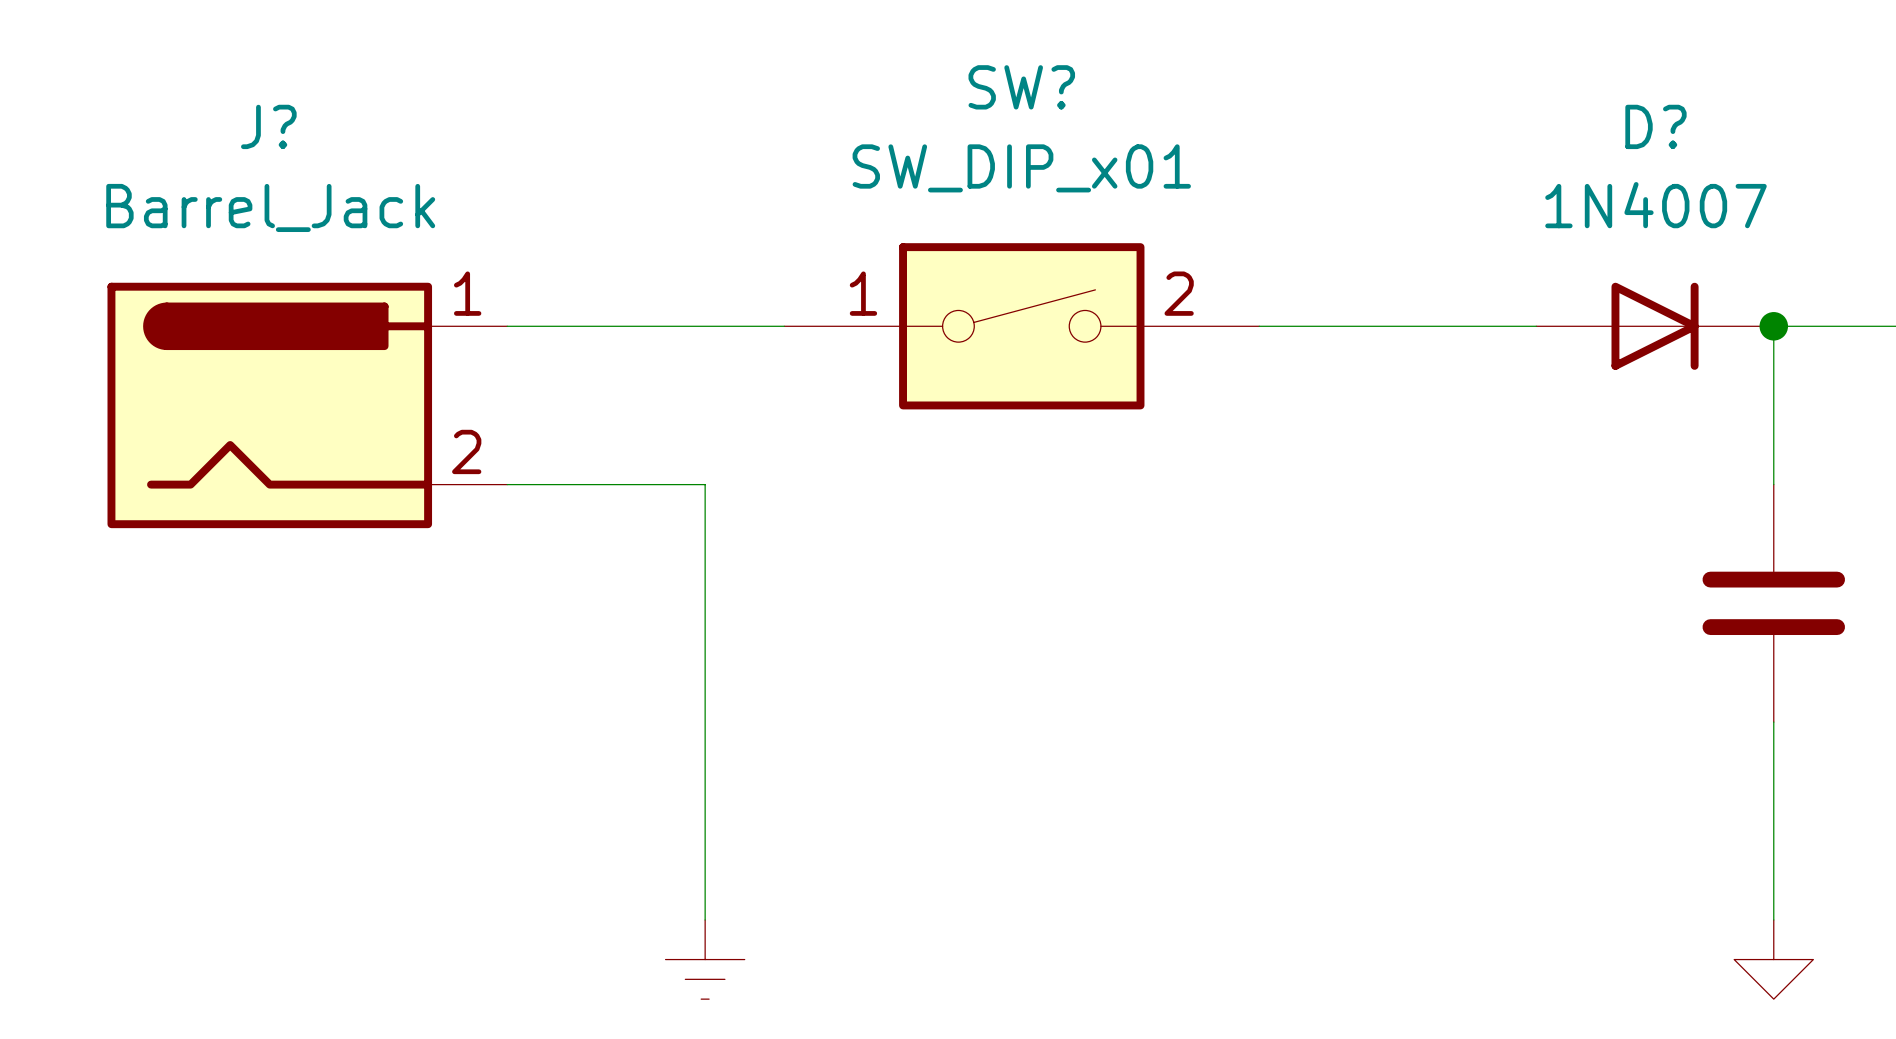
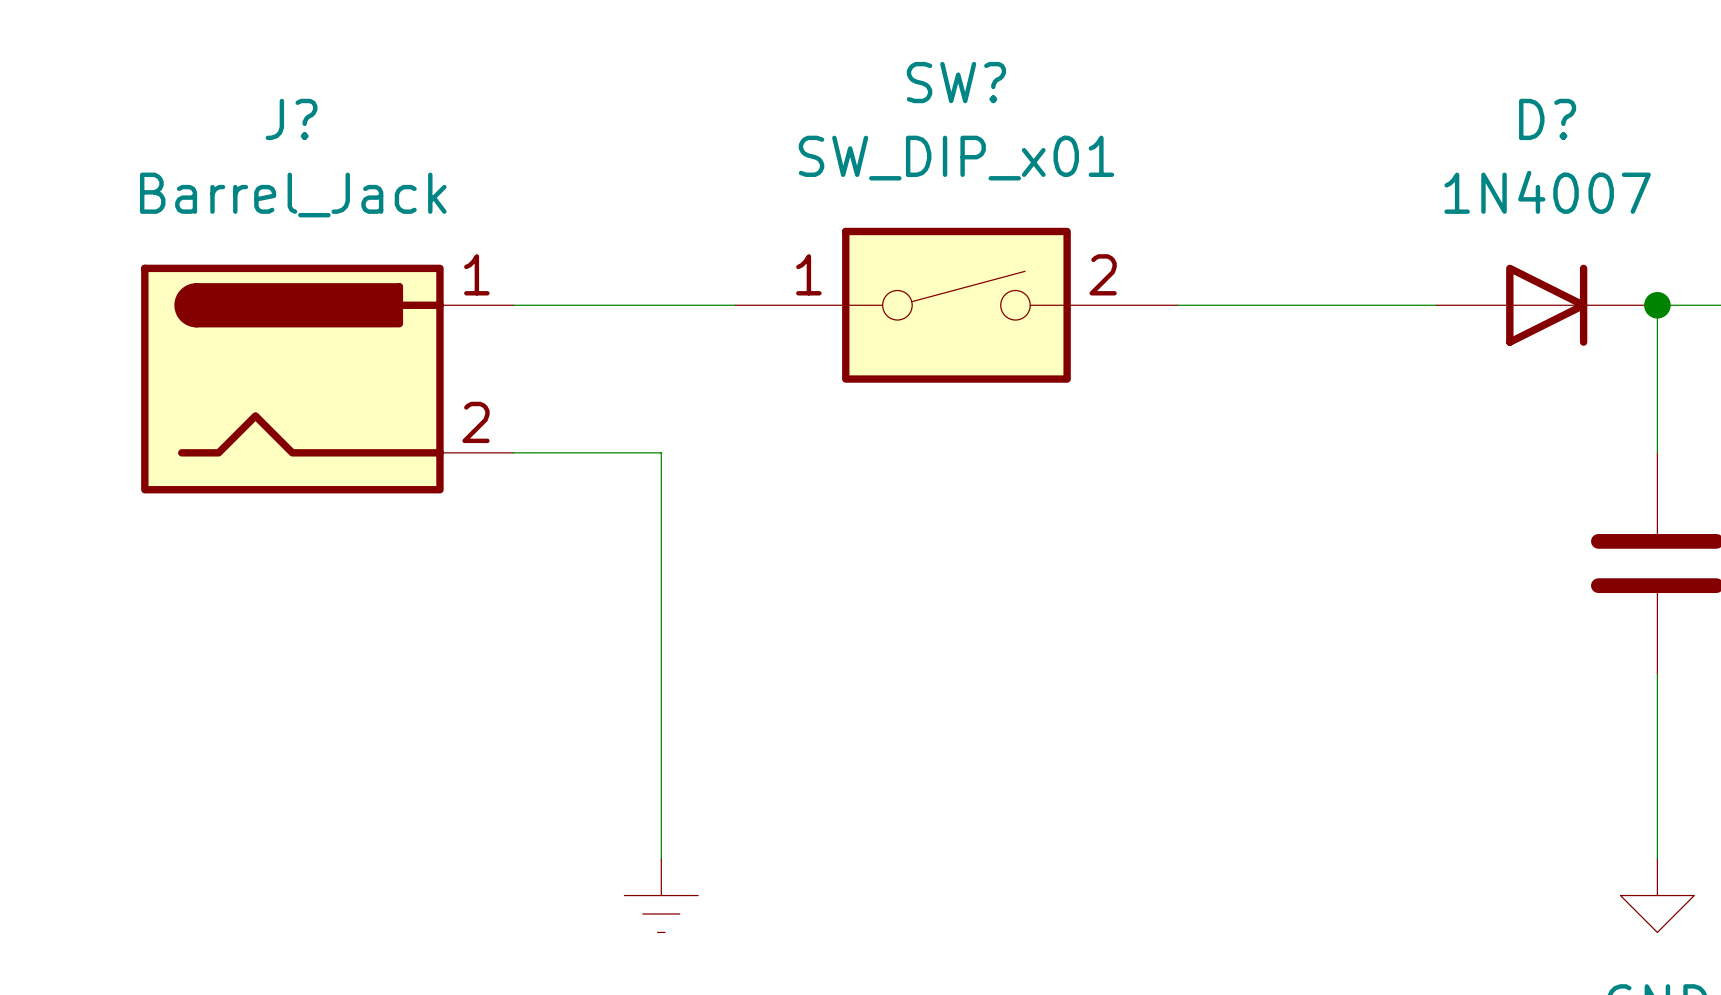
J? position: (307, 405) -> (327, 379)

